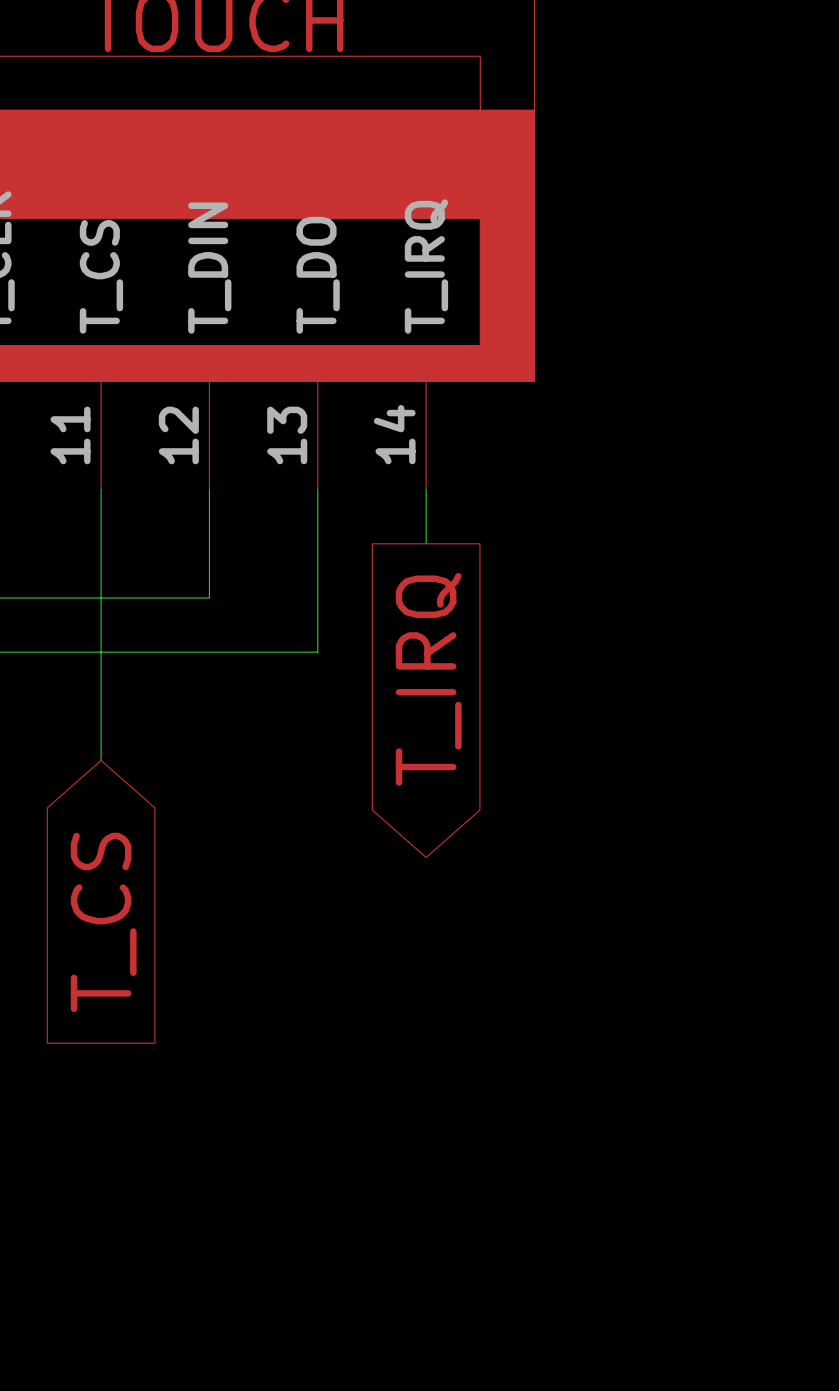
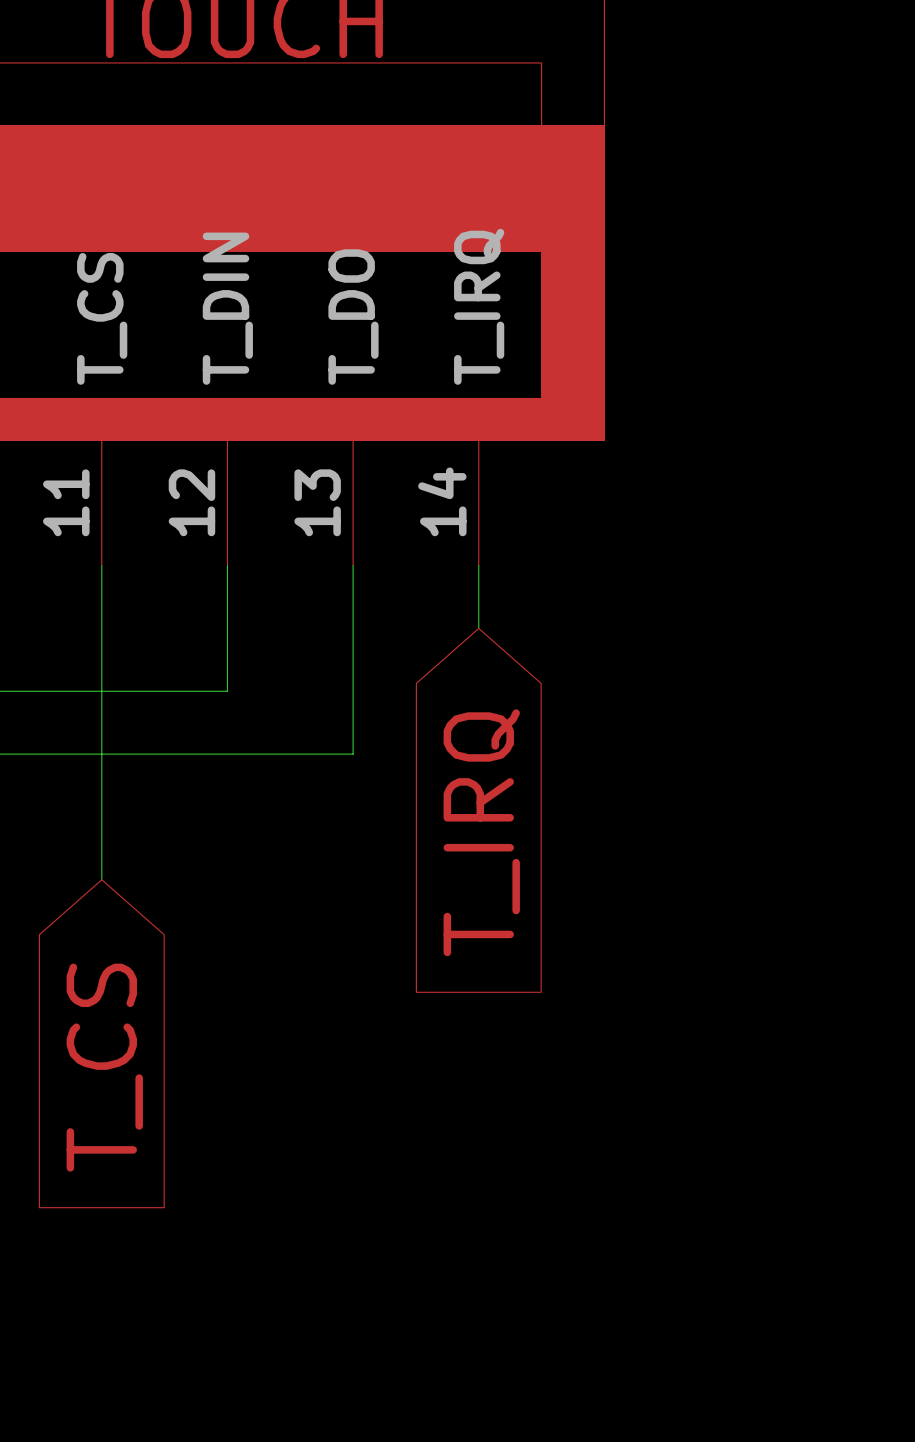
global label shape: output (428, 679) -> input (481, 832)

